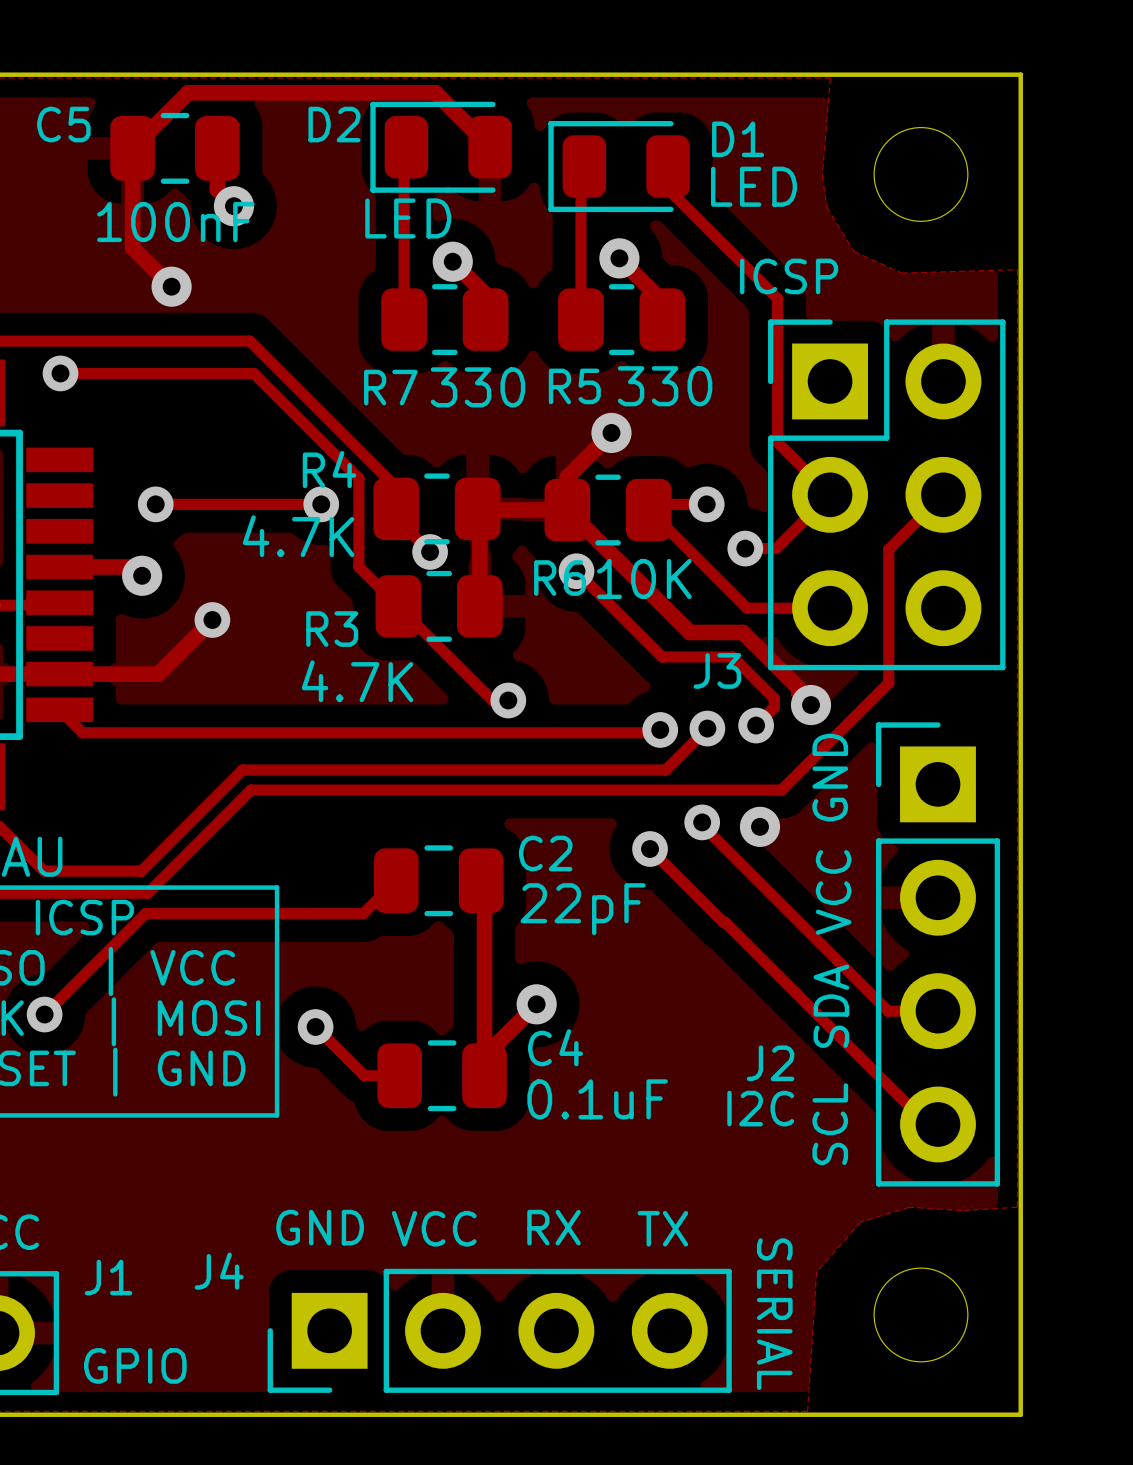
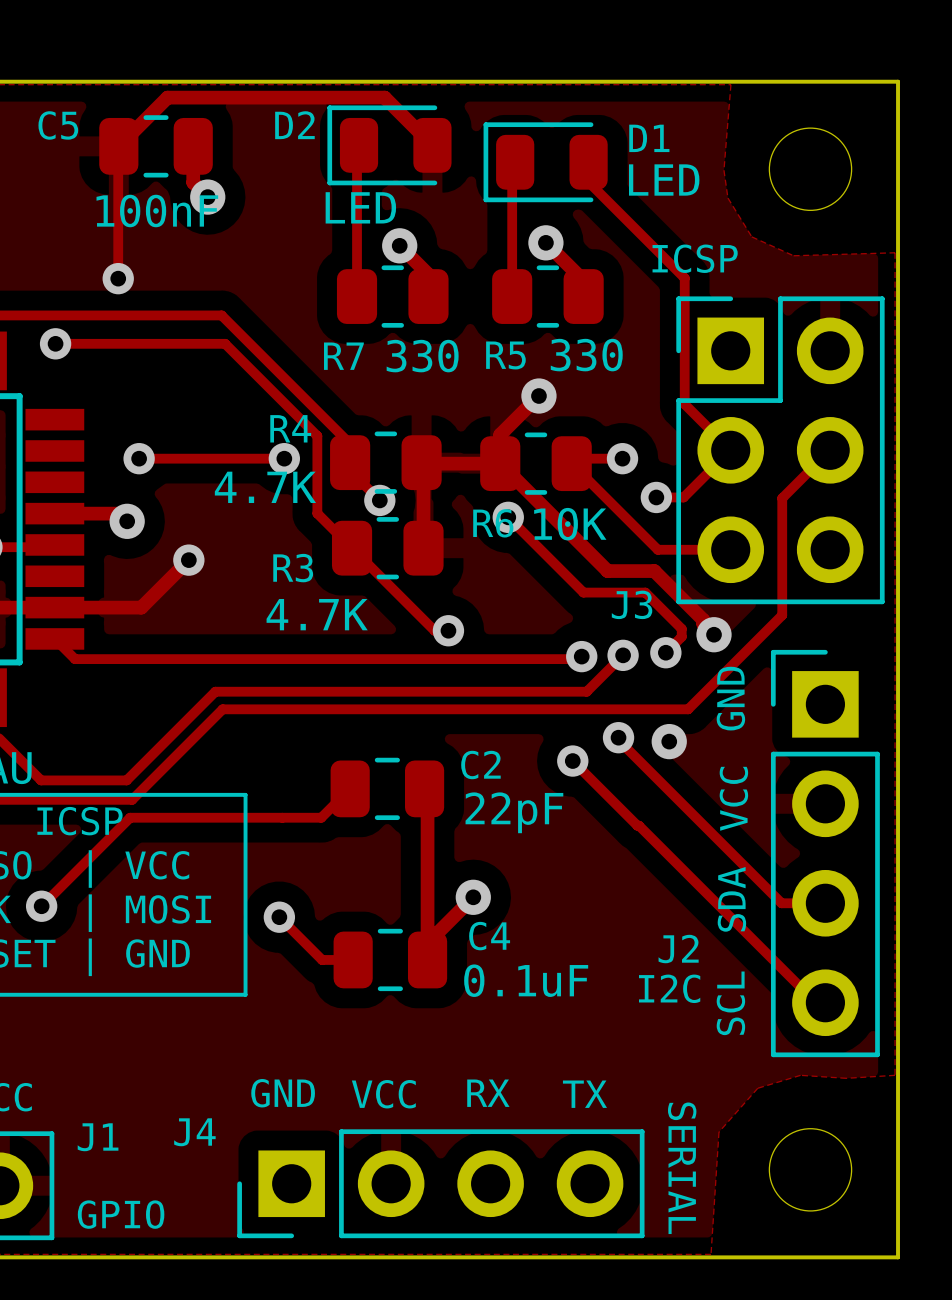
track: (132, 148) (132, 247) (171, 286) -> (118, 146) (118, 278)
via: (171, 286) -> none
via: none -> (118, 278)

